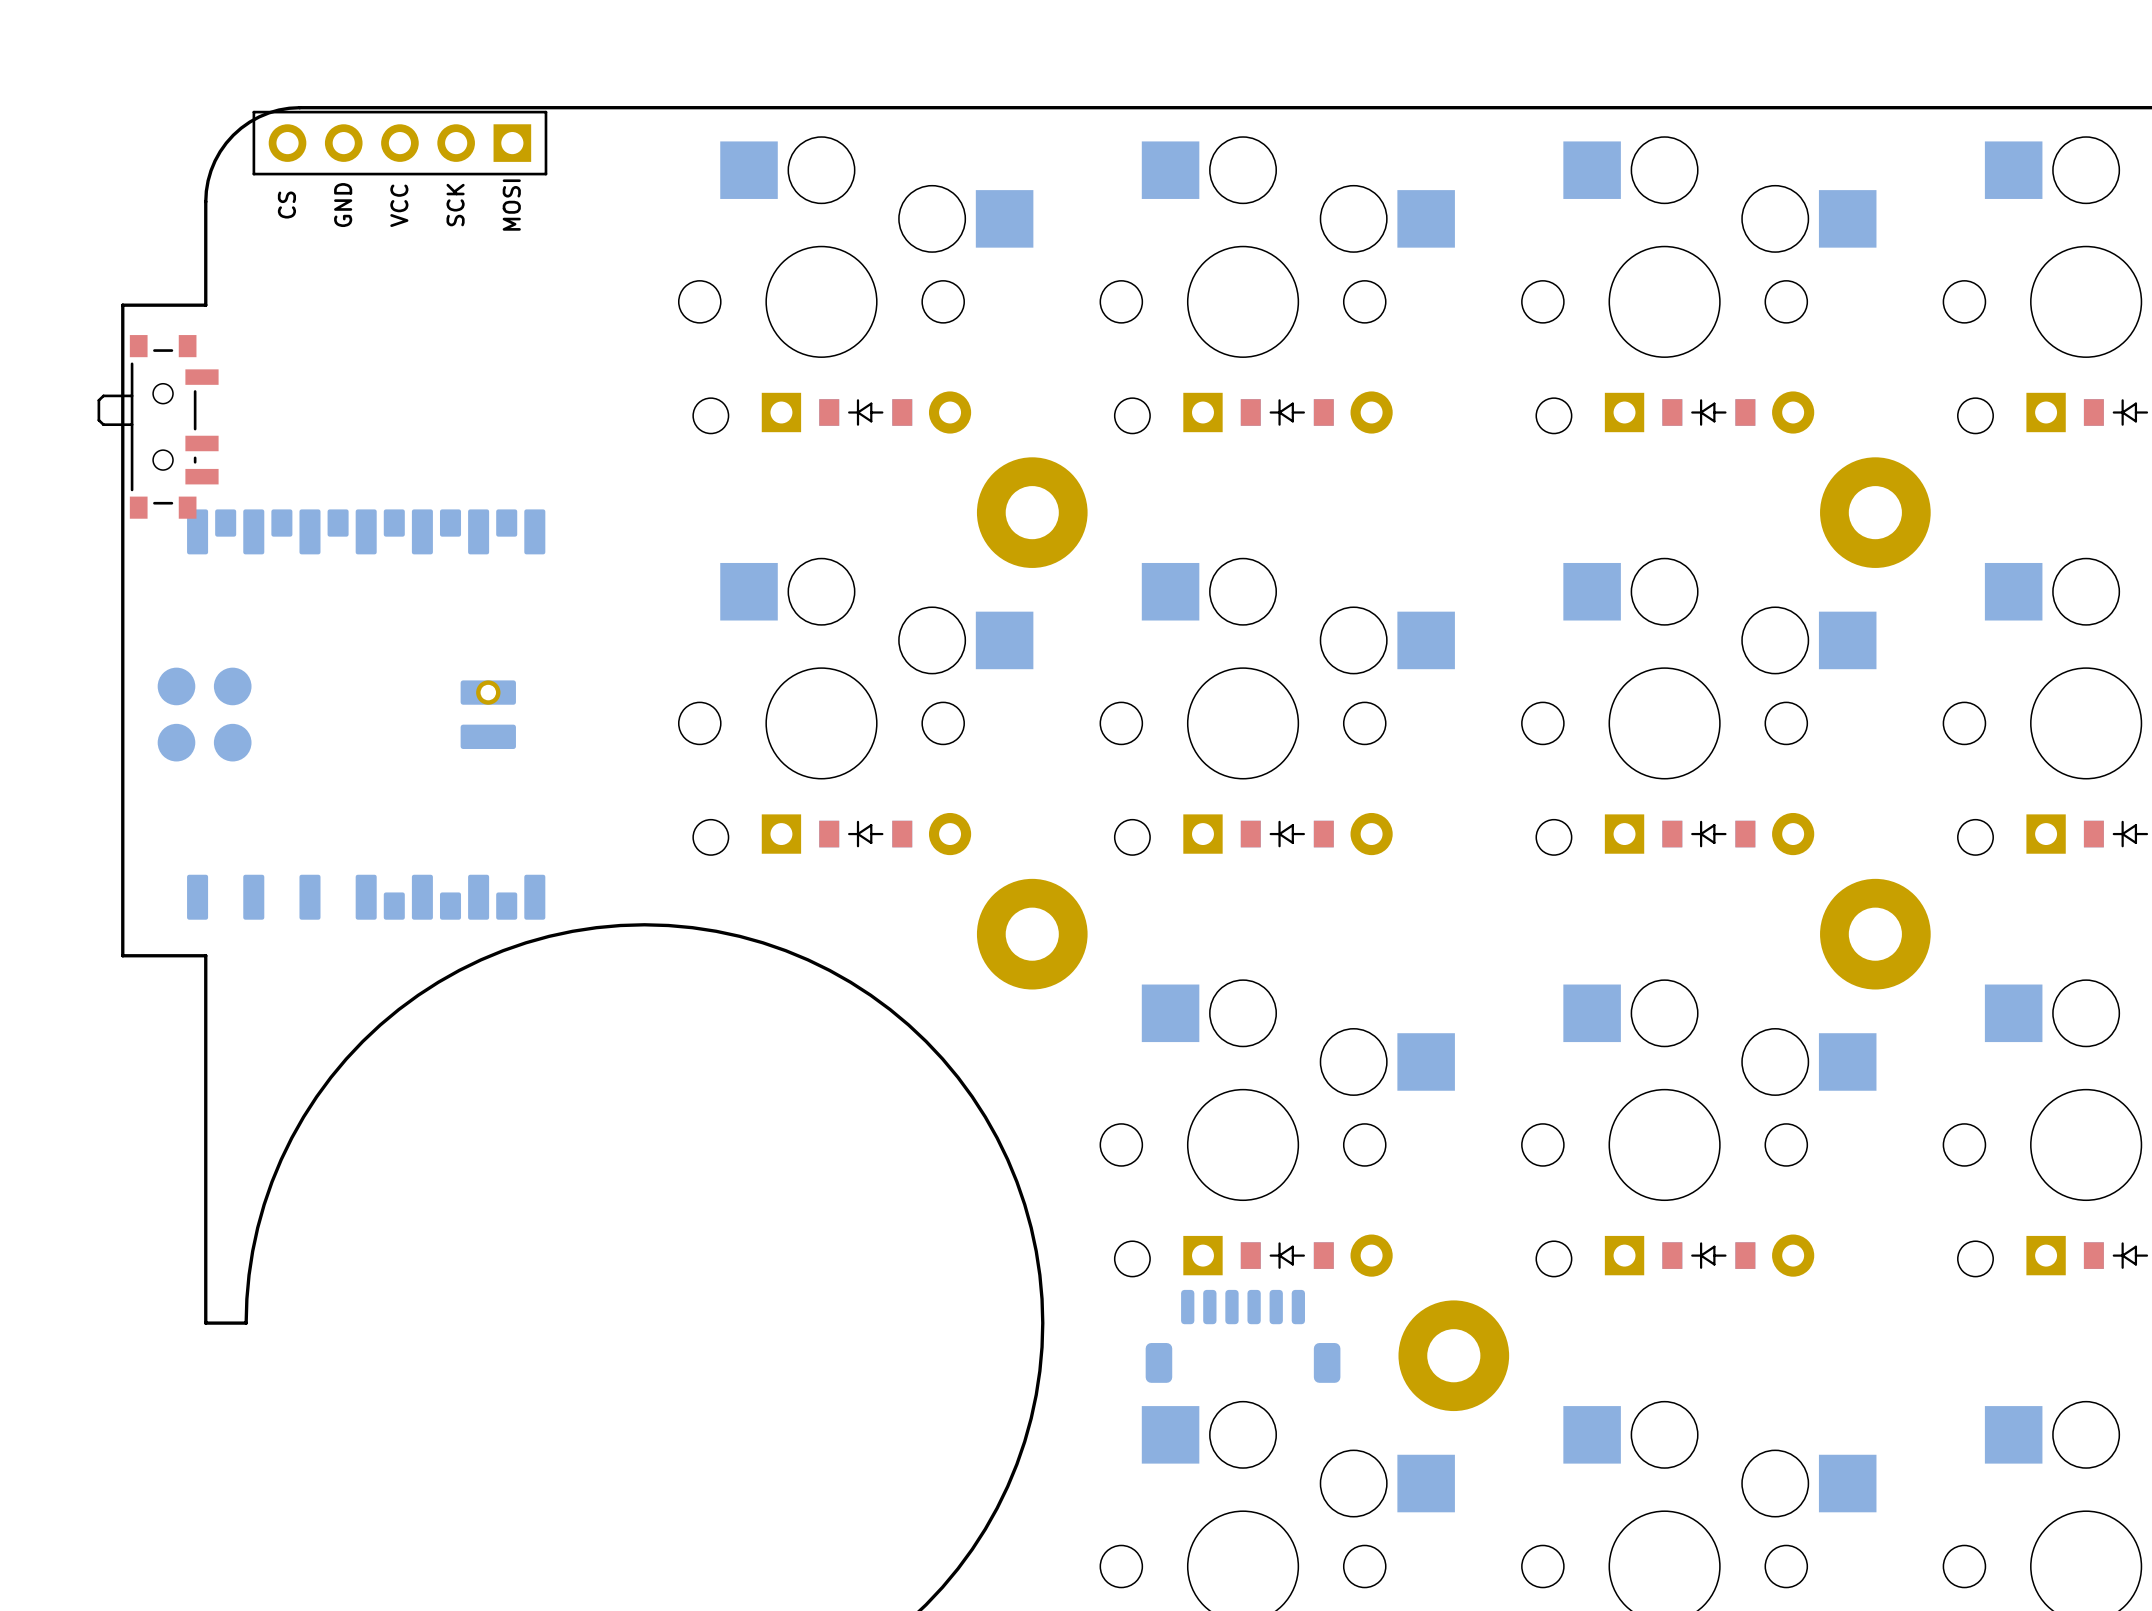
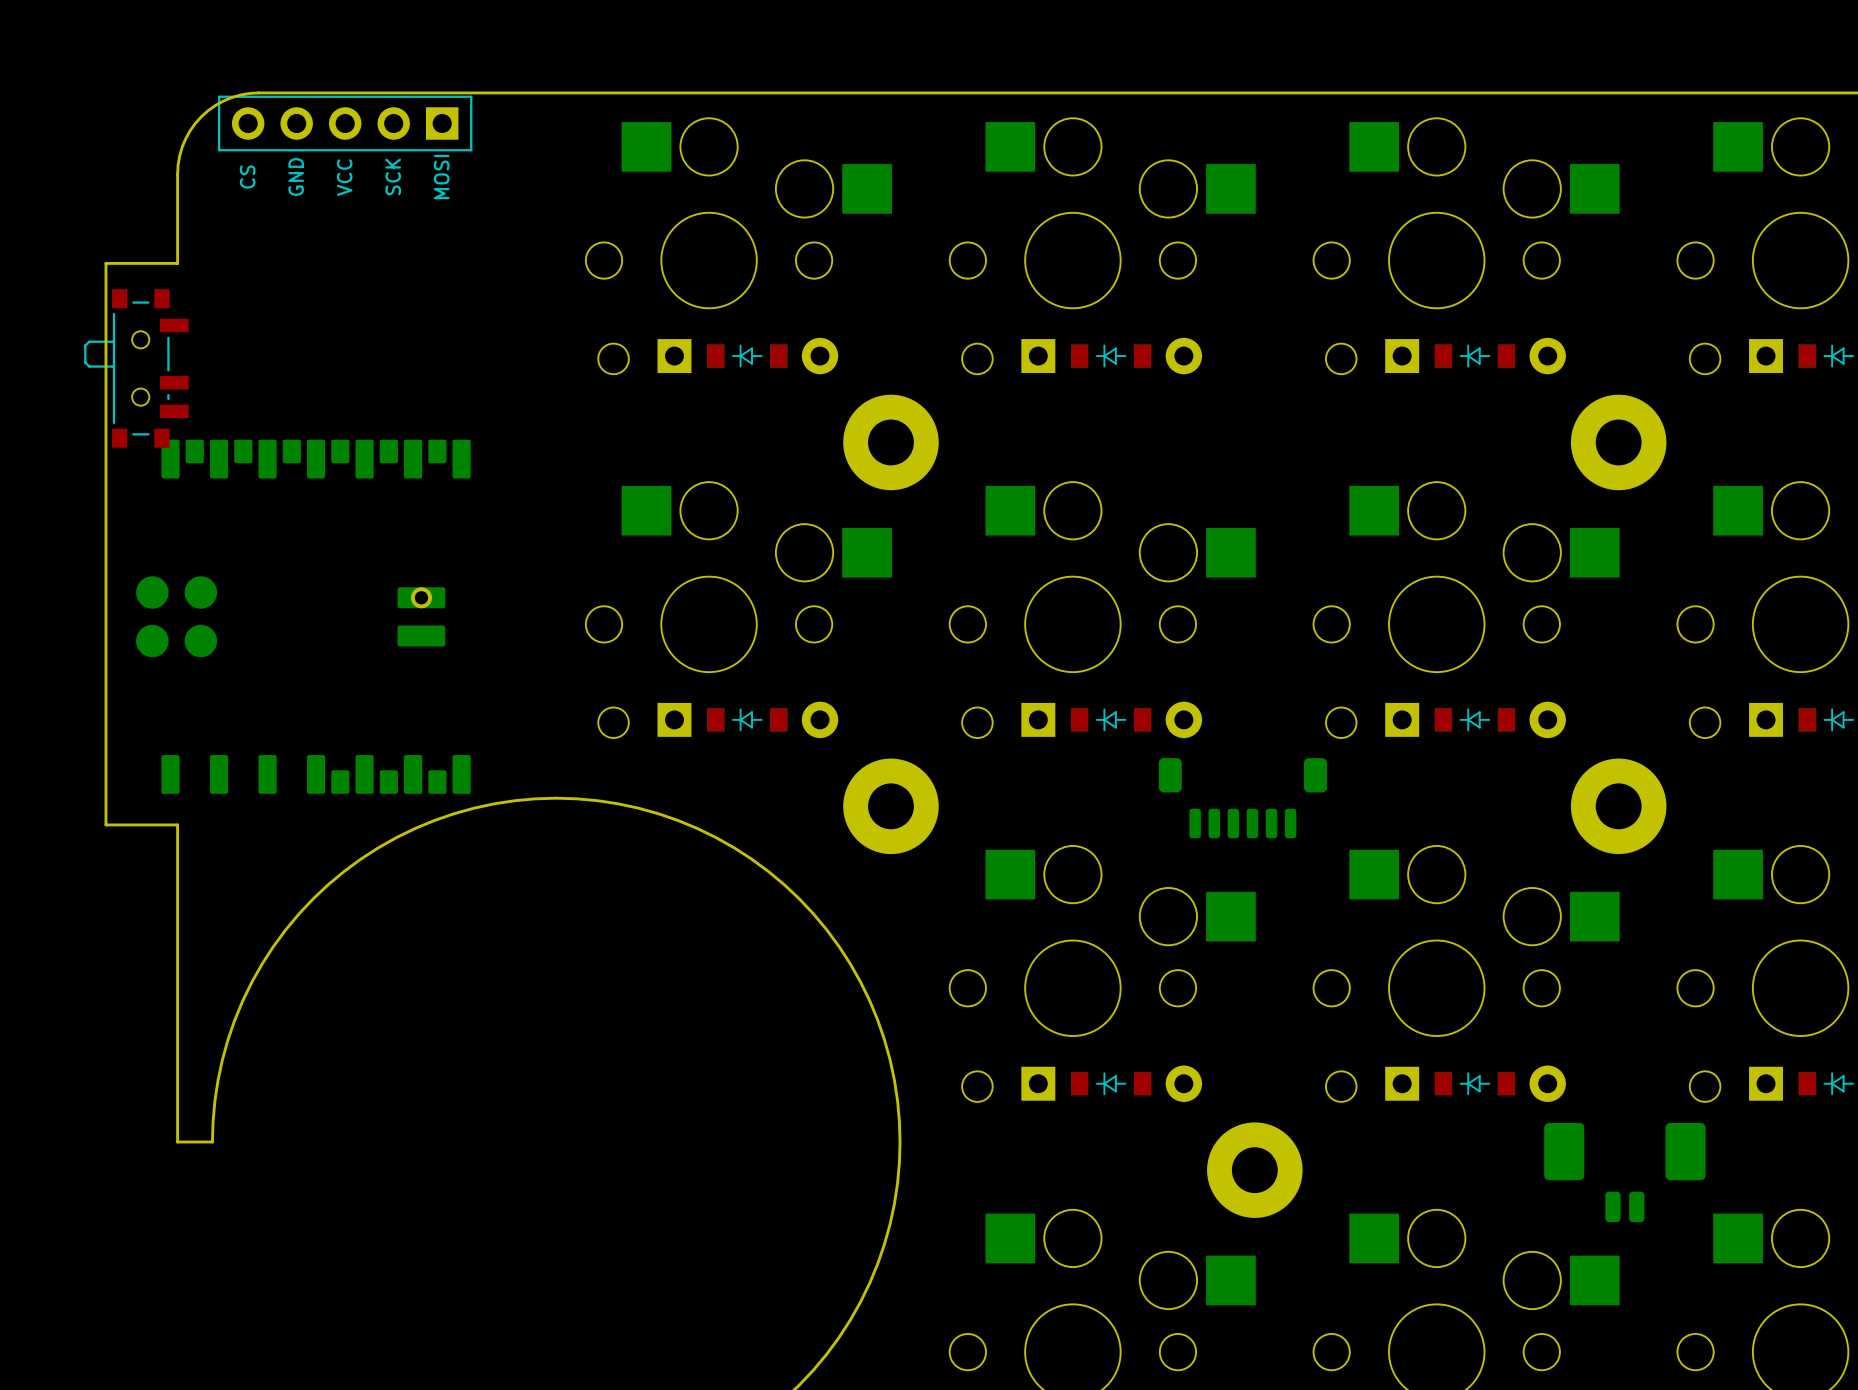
part rotation: 0° (1243, 1336) -> 180° (1242, 798)
part position: (1243, 1336) -> (1242, 798)
part: none -> (1624, 1172)

